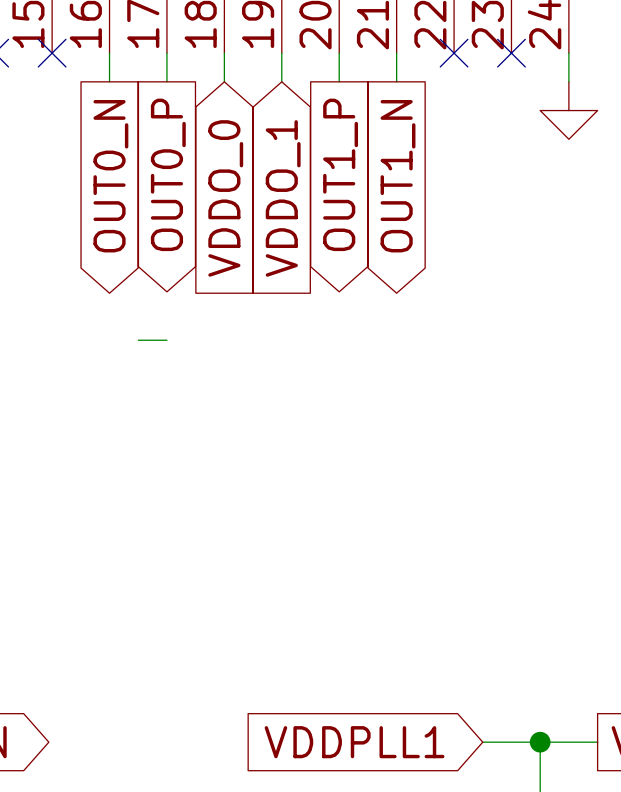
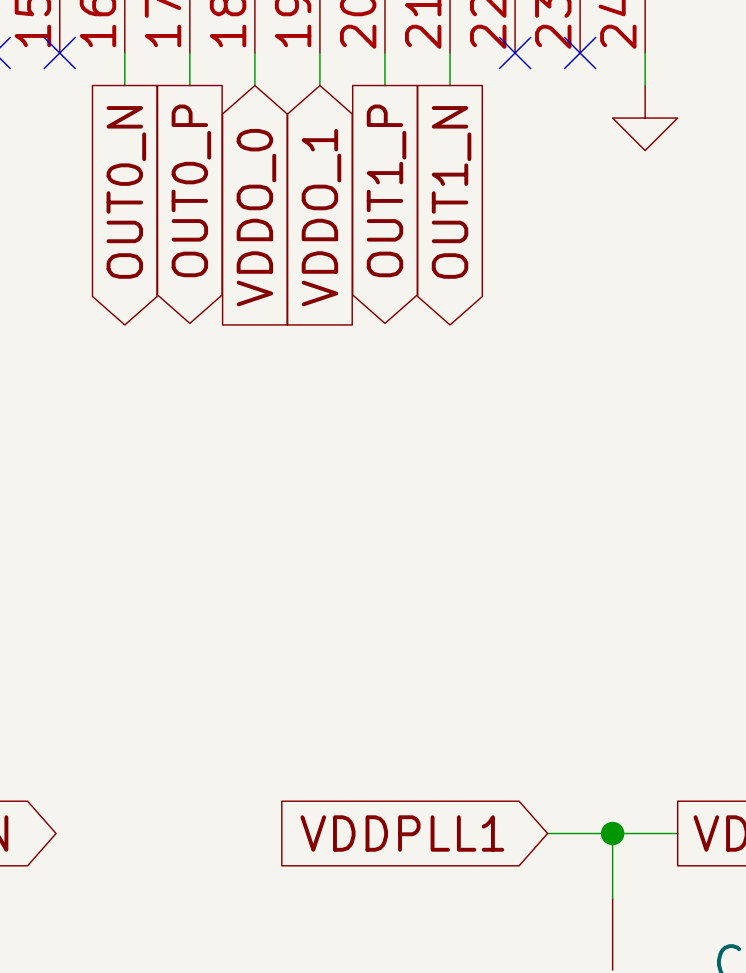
wire: (138, 340) (166, 340) -> none

